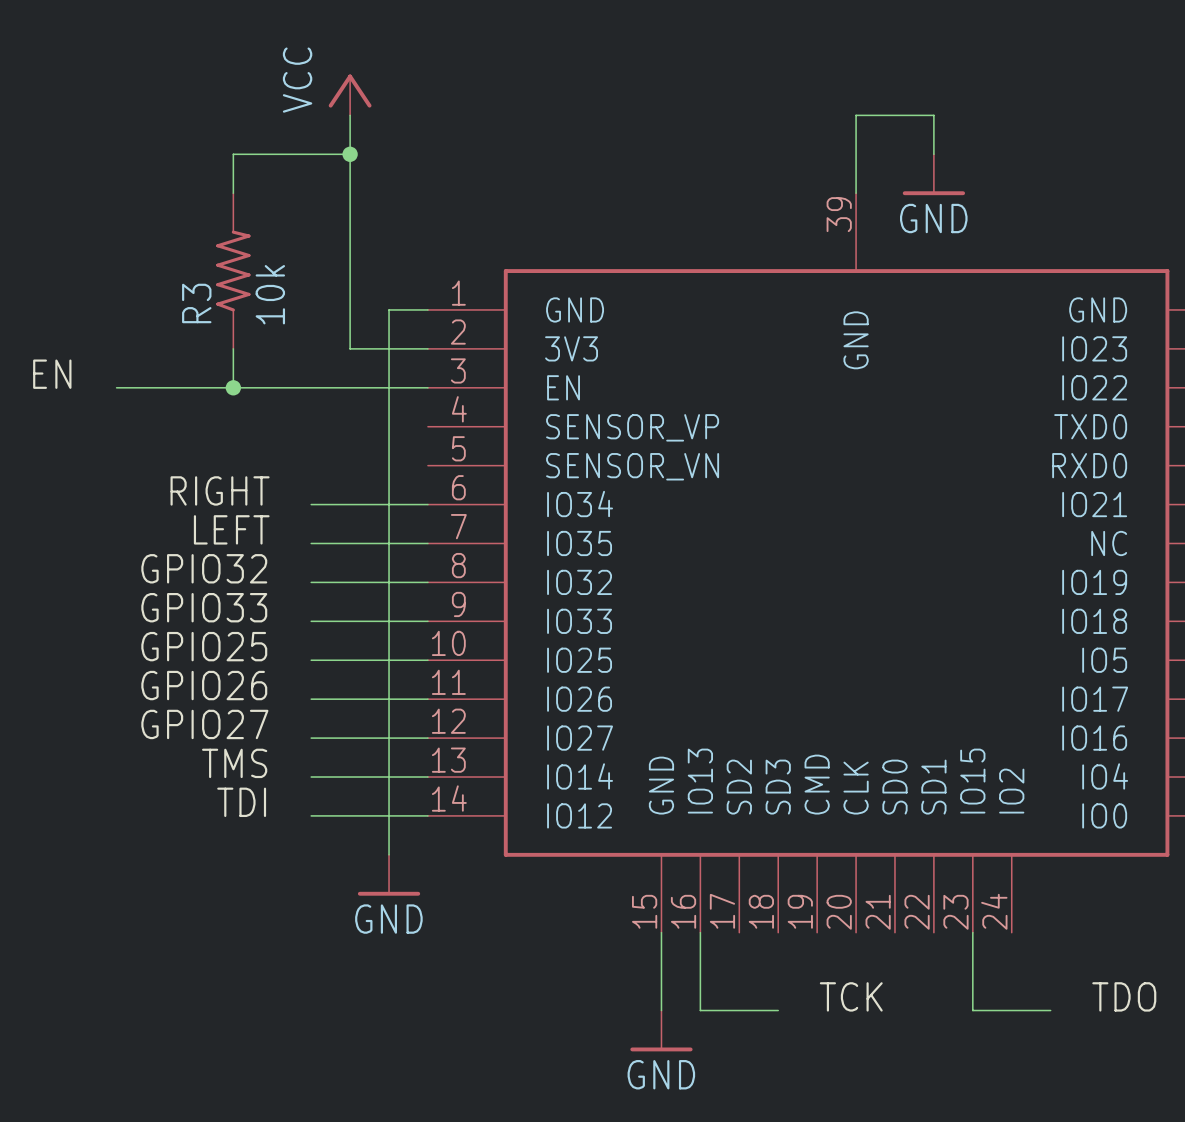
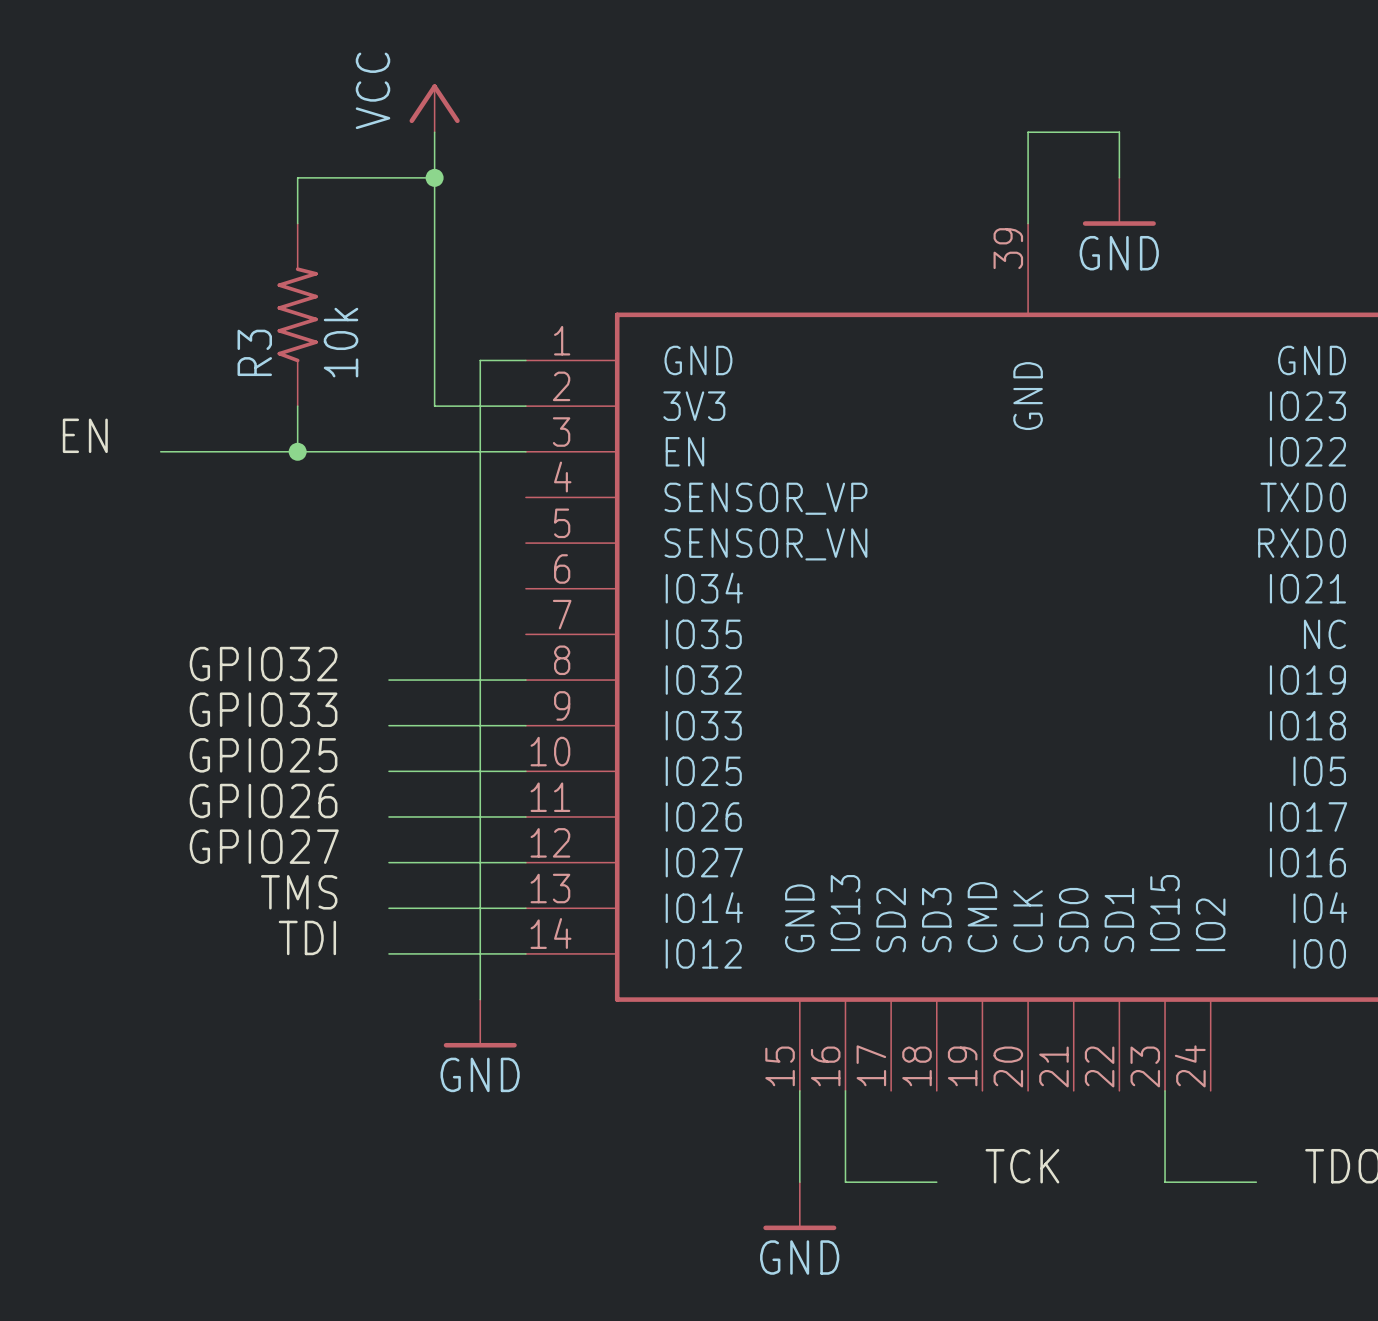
label: RIGHT (220, 490) -> none
wire: (311, 504) (427, 504) -> none
label: LEFT (231, 529) -> none
wire: (311, 543) (427, 543) -> none

